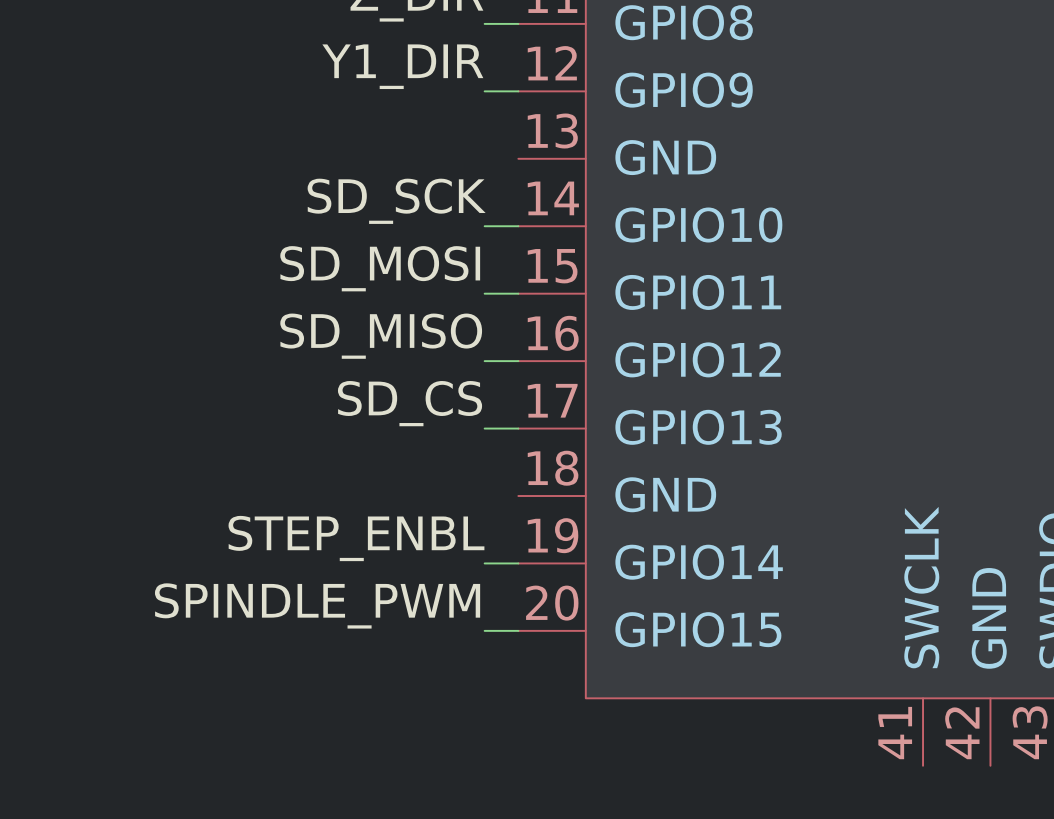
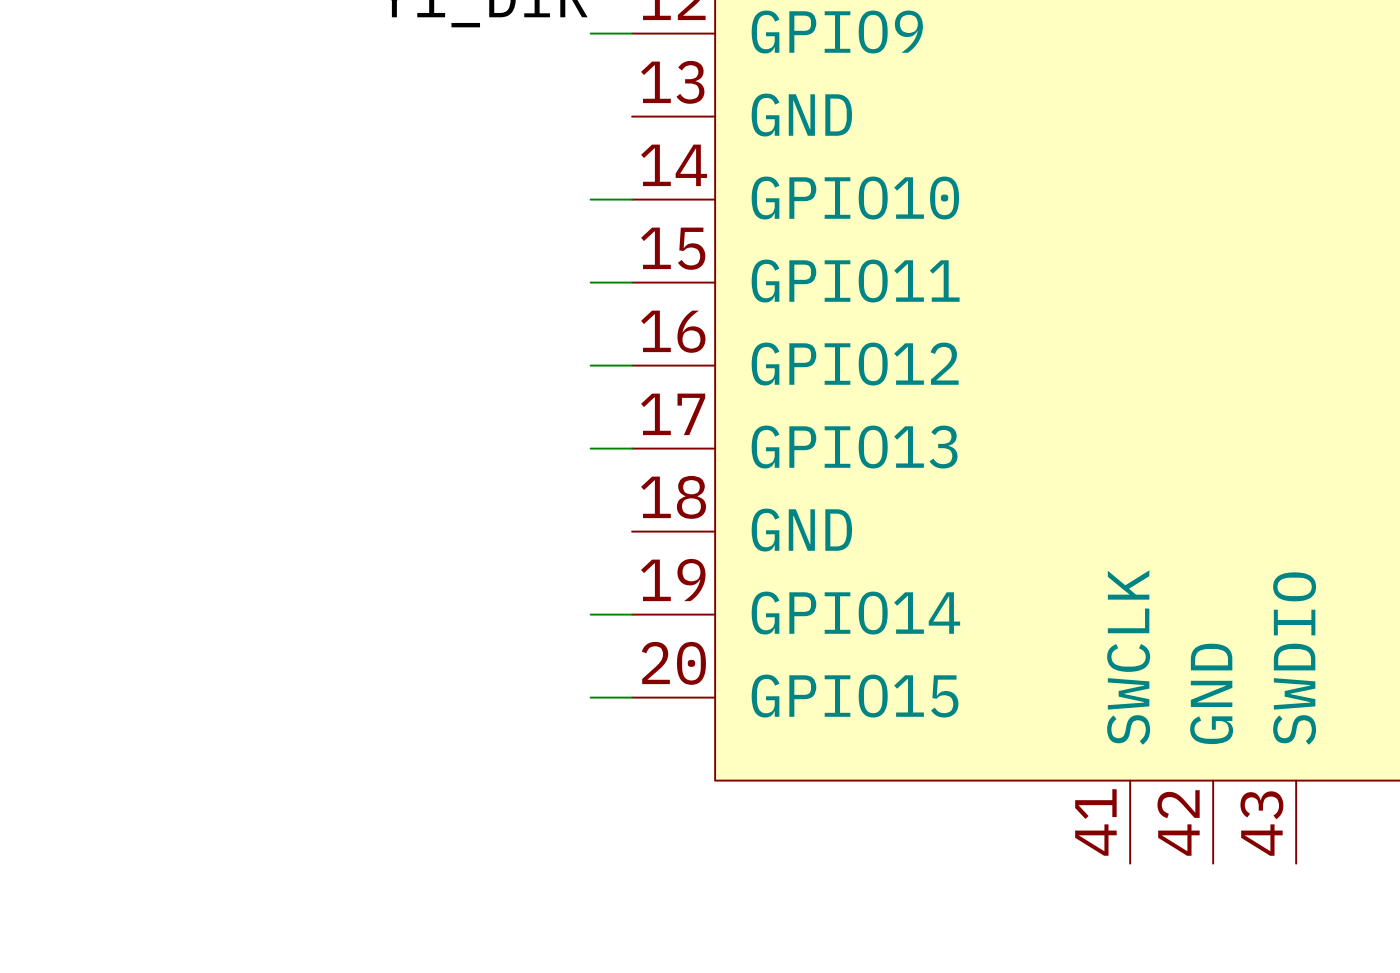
label: SD_SCK (396, 201) -> none
label: SD_MOSI (380, 268) -> none
label: SD_MISO (381, 336) -> none
label: SD_CS (410, 403) -> none
label: STEP_ENBL (356, 538) -> none
label: SPINDLE_PWM (317, 605) -> none

